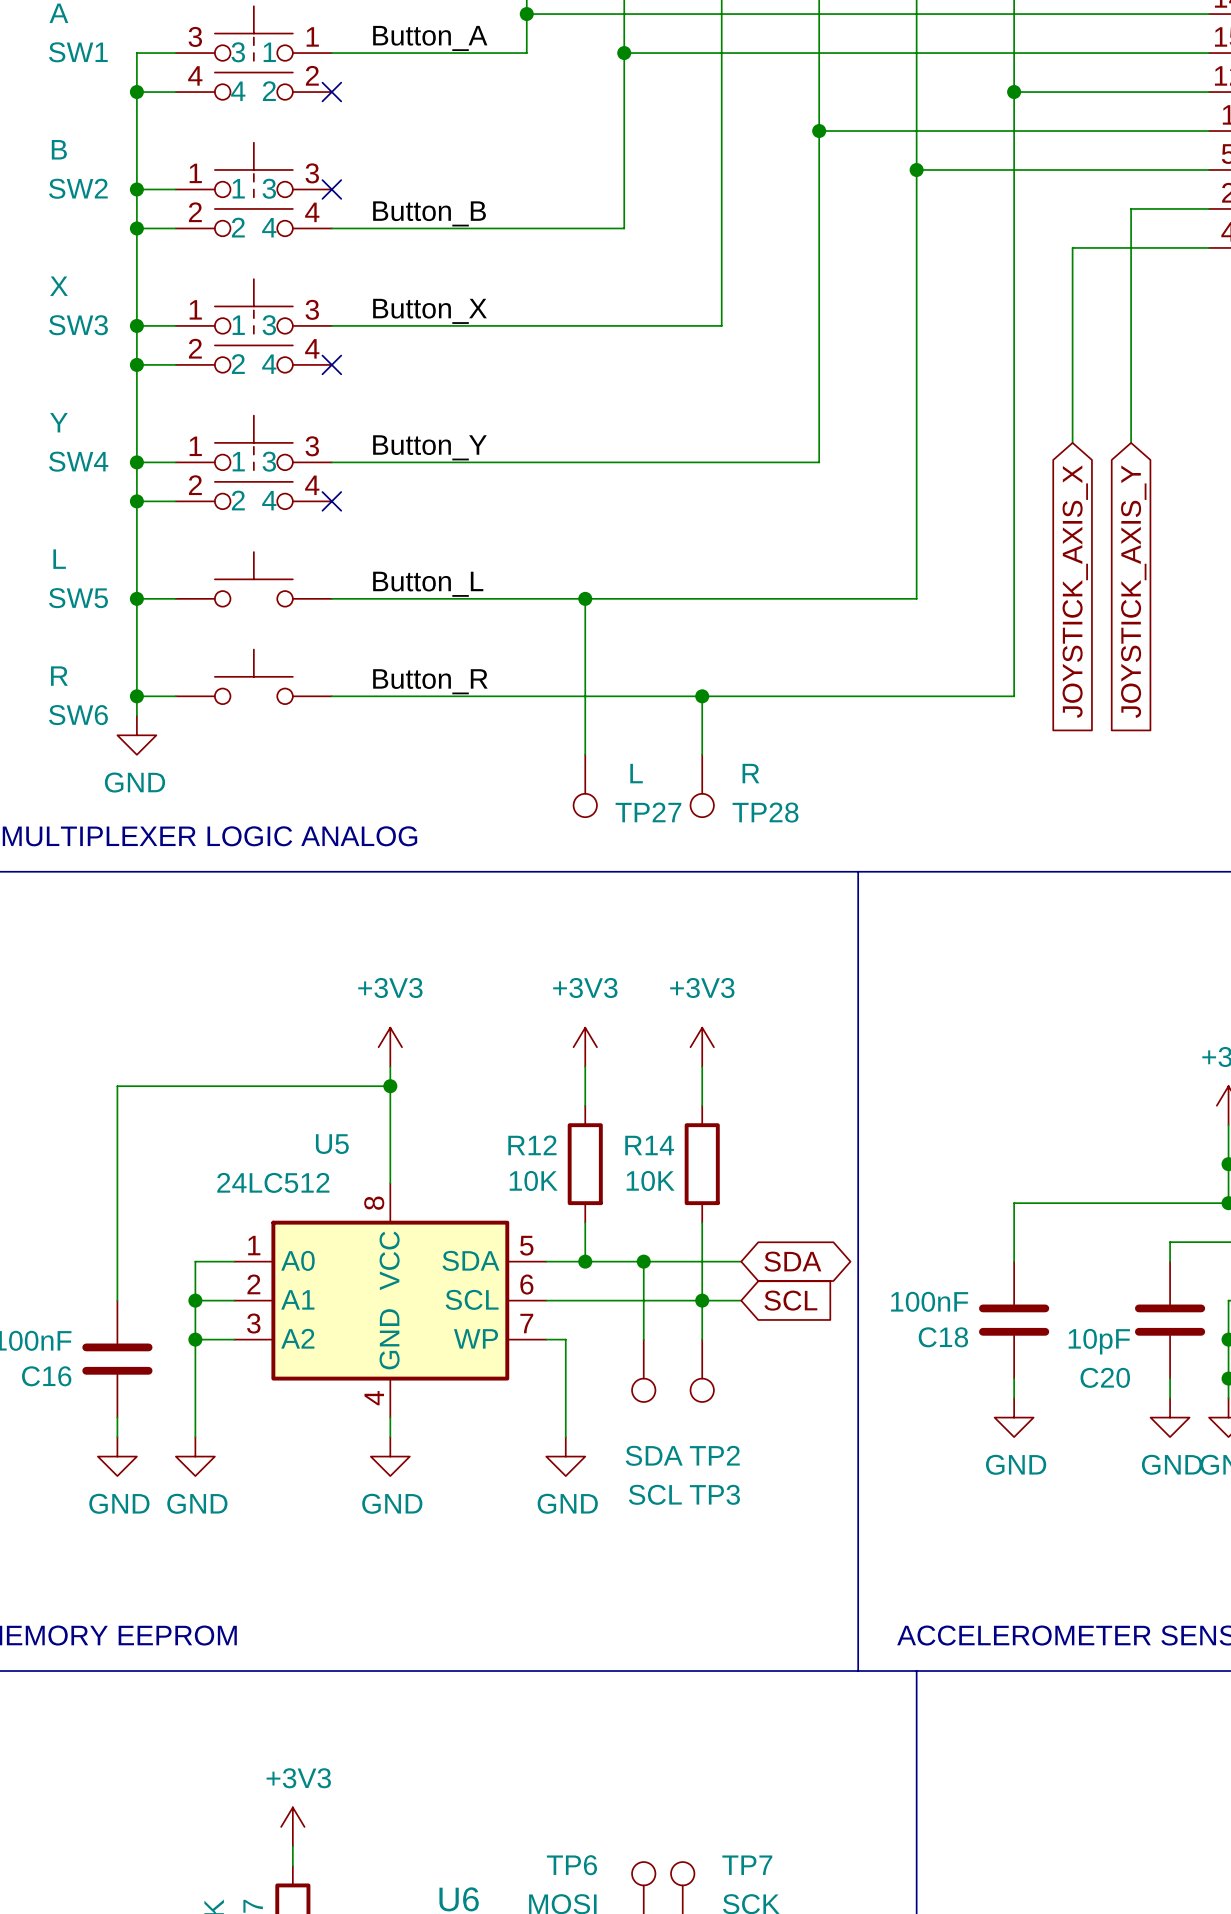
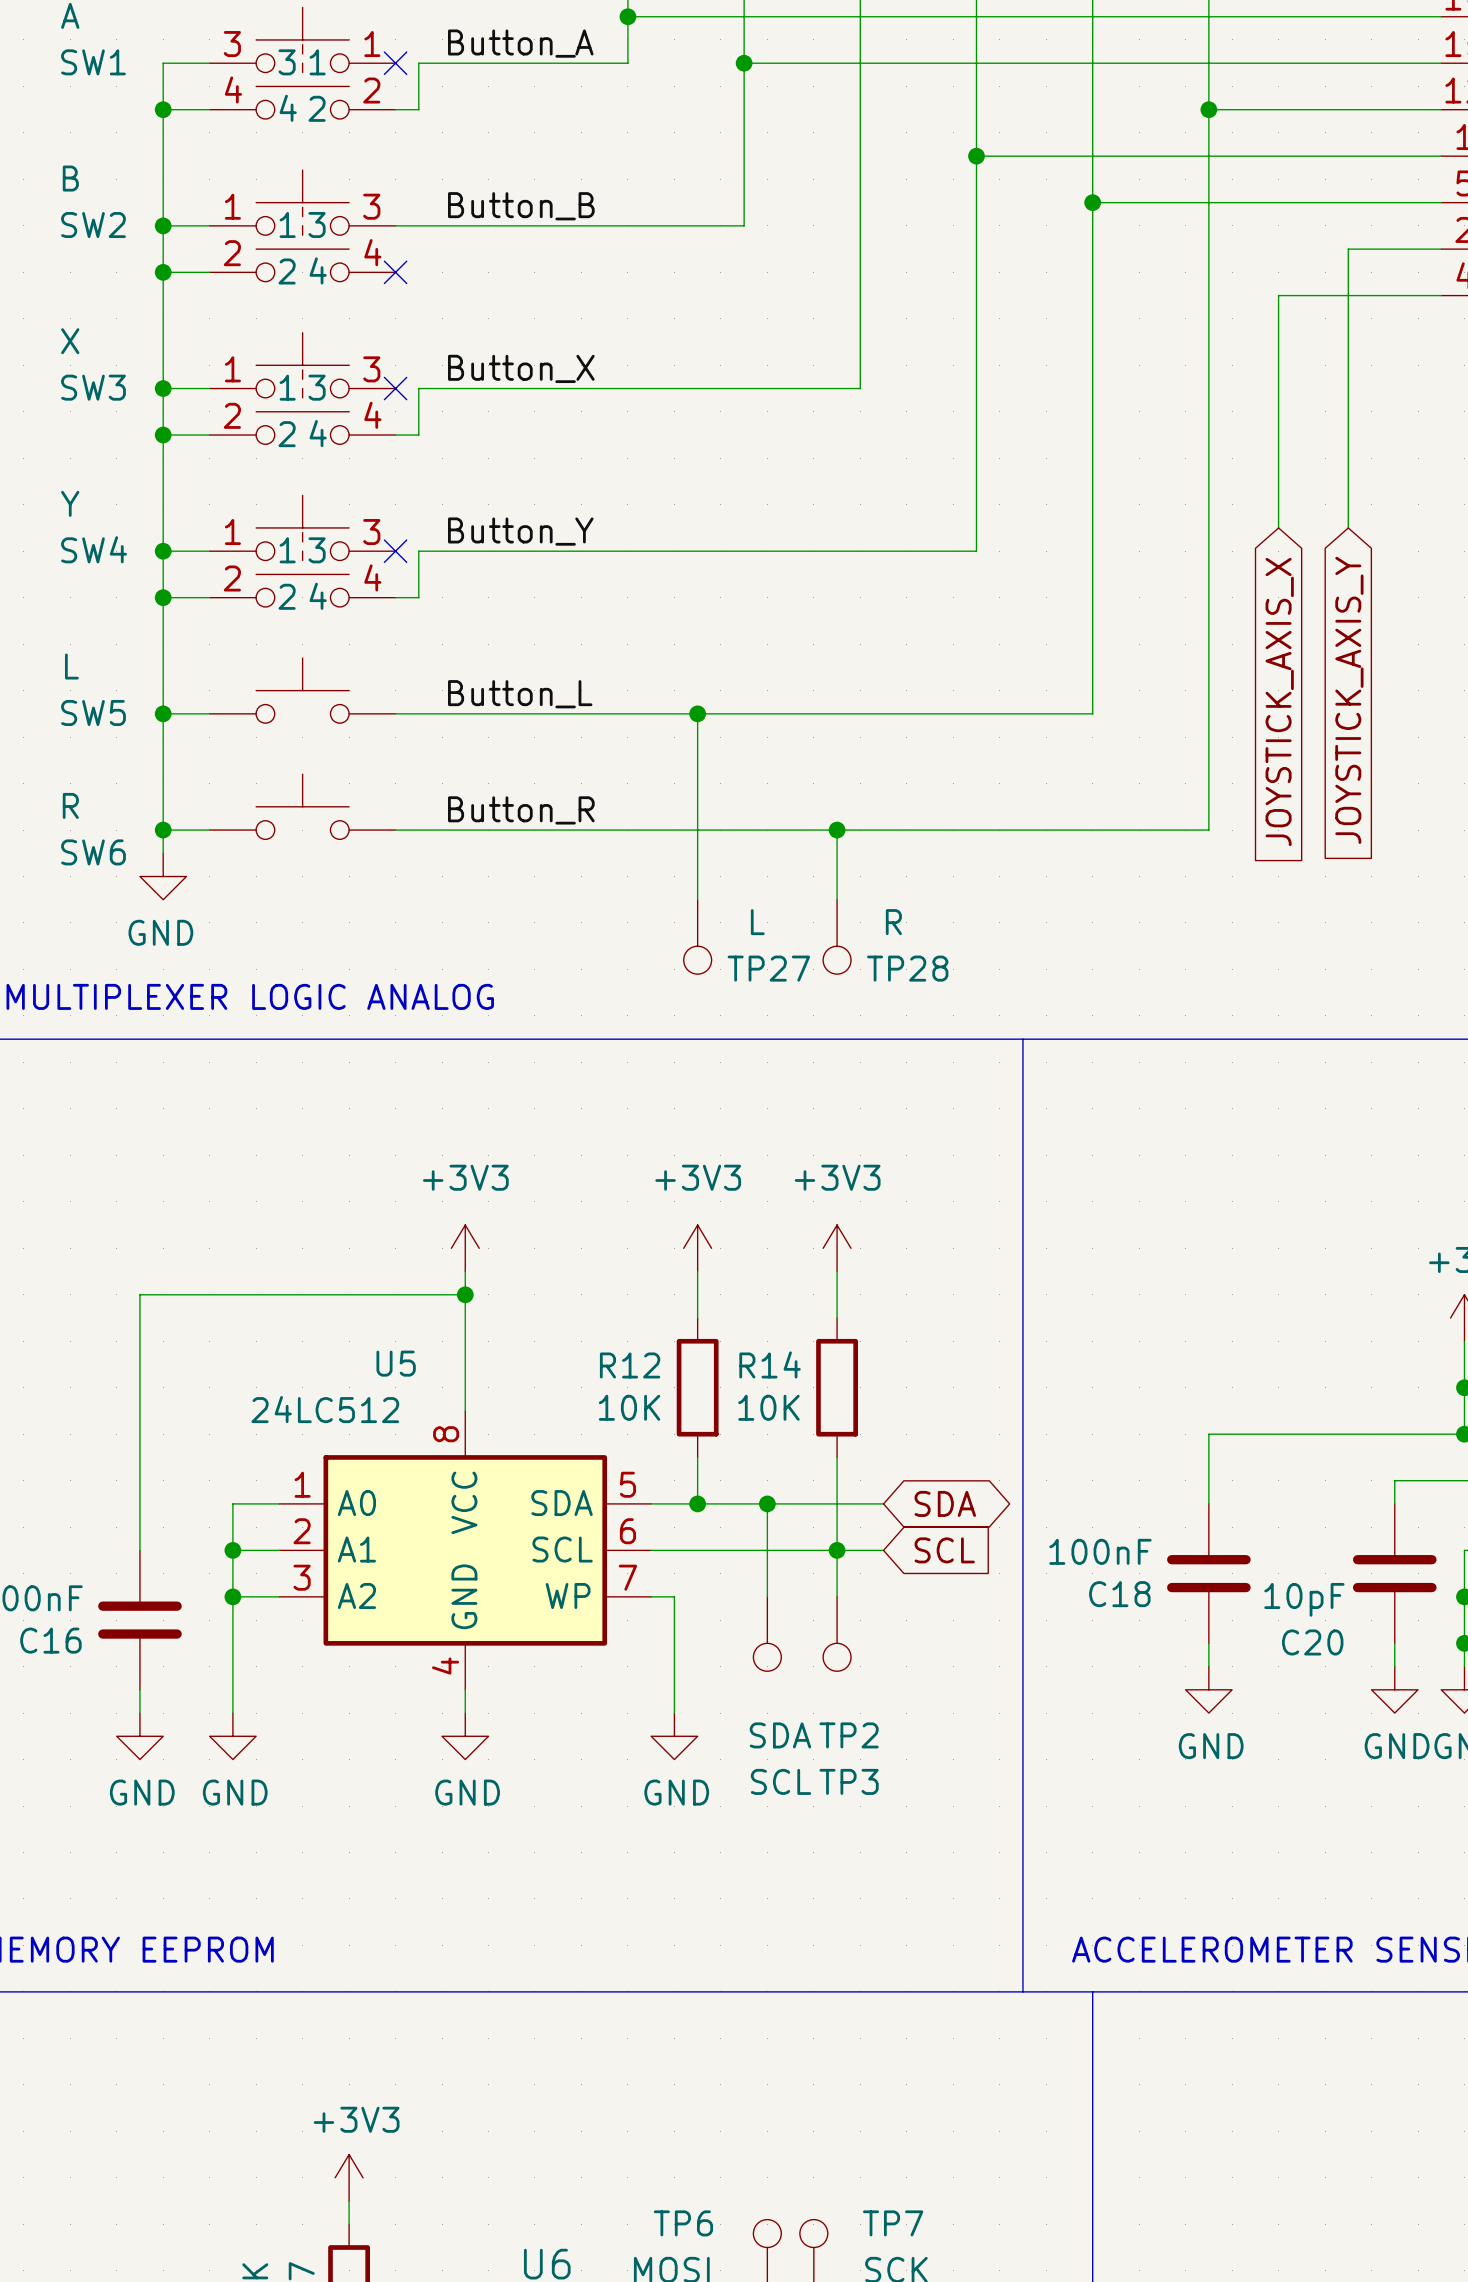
wire: (331, 53) (351, 53) -> (395, 109) (418, 109) (418, 63)
no-connect mark position: (331, 92) -> (395, 63)
no-connect mark position: (331, 189) -> (395, 272)
wire: (624, 189) (624, 228) (331, 228) -> (744, 225) (395, 225)
label position: Button_B (429, 213) -> Button_B (521, 206)
wire: (331, 325) (351, 325) -> (395, 435) (418, 435) (418, 388)
no-connect mark position: (331, 364) -> (395, 388)
wire: (331, 462) (351, 462) -> (395, 597) (418, 597) (418, 551)
no-connect mark position: (331, 501) -> (395, 551)

